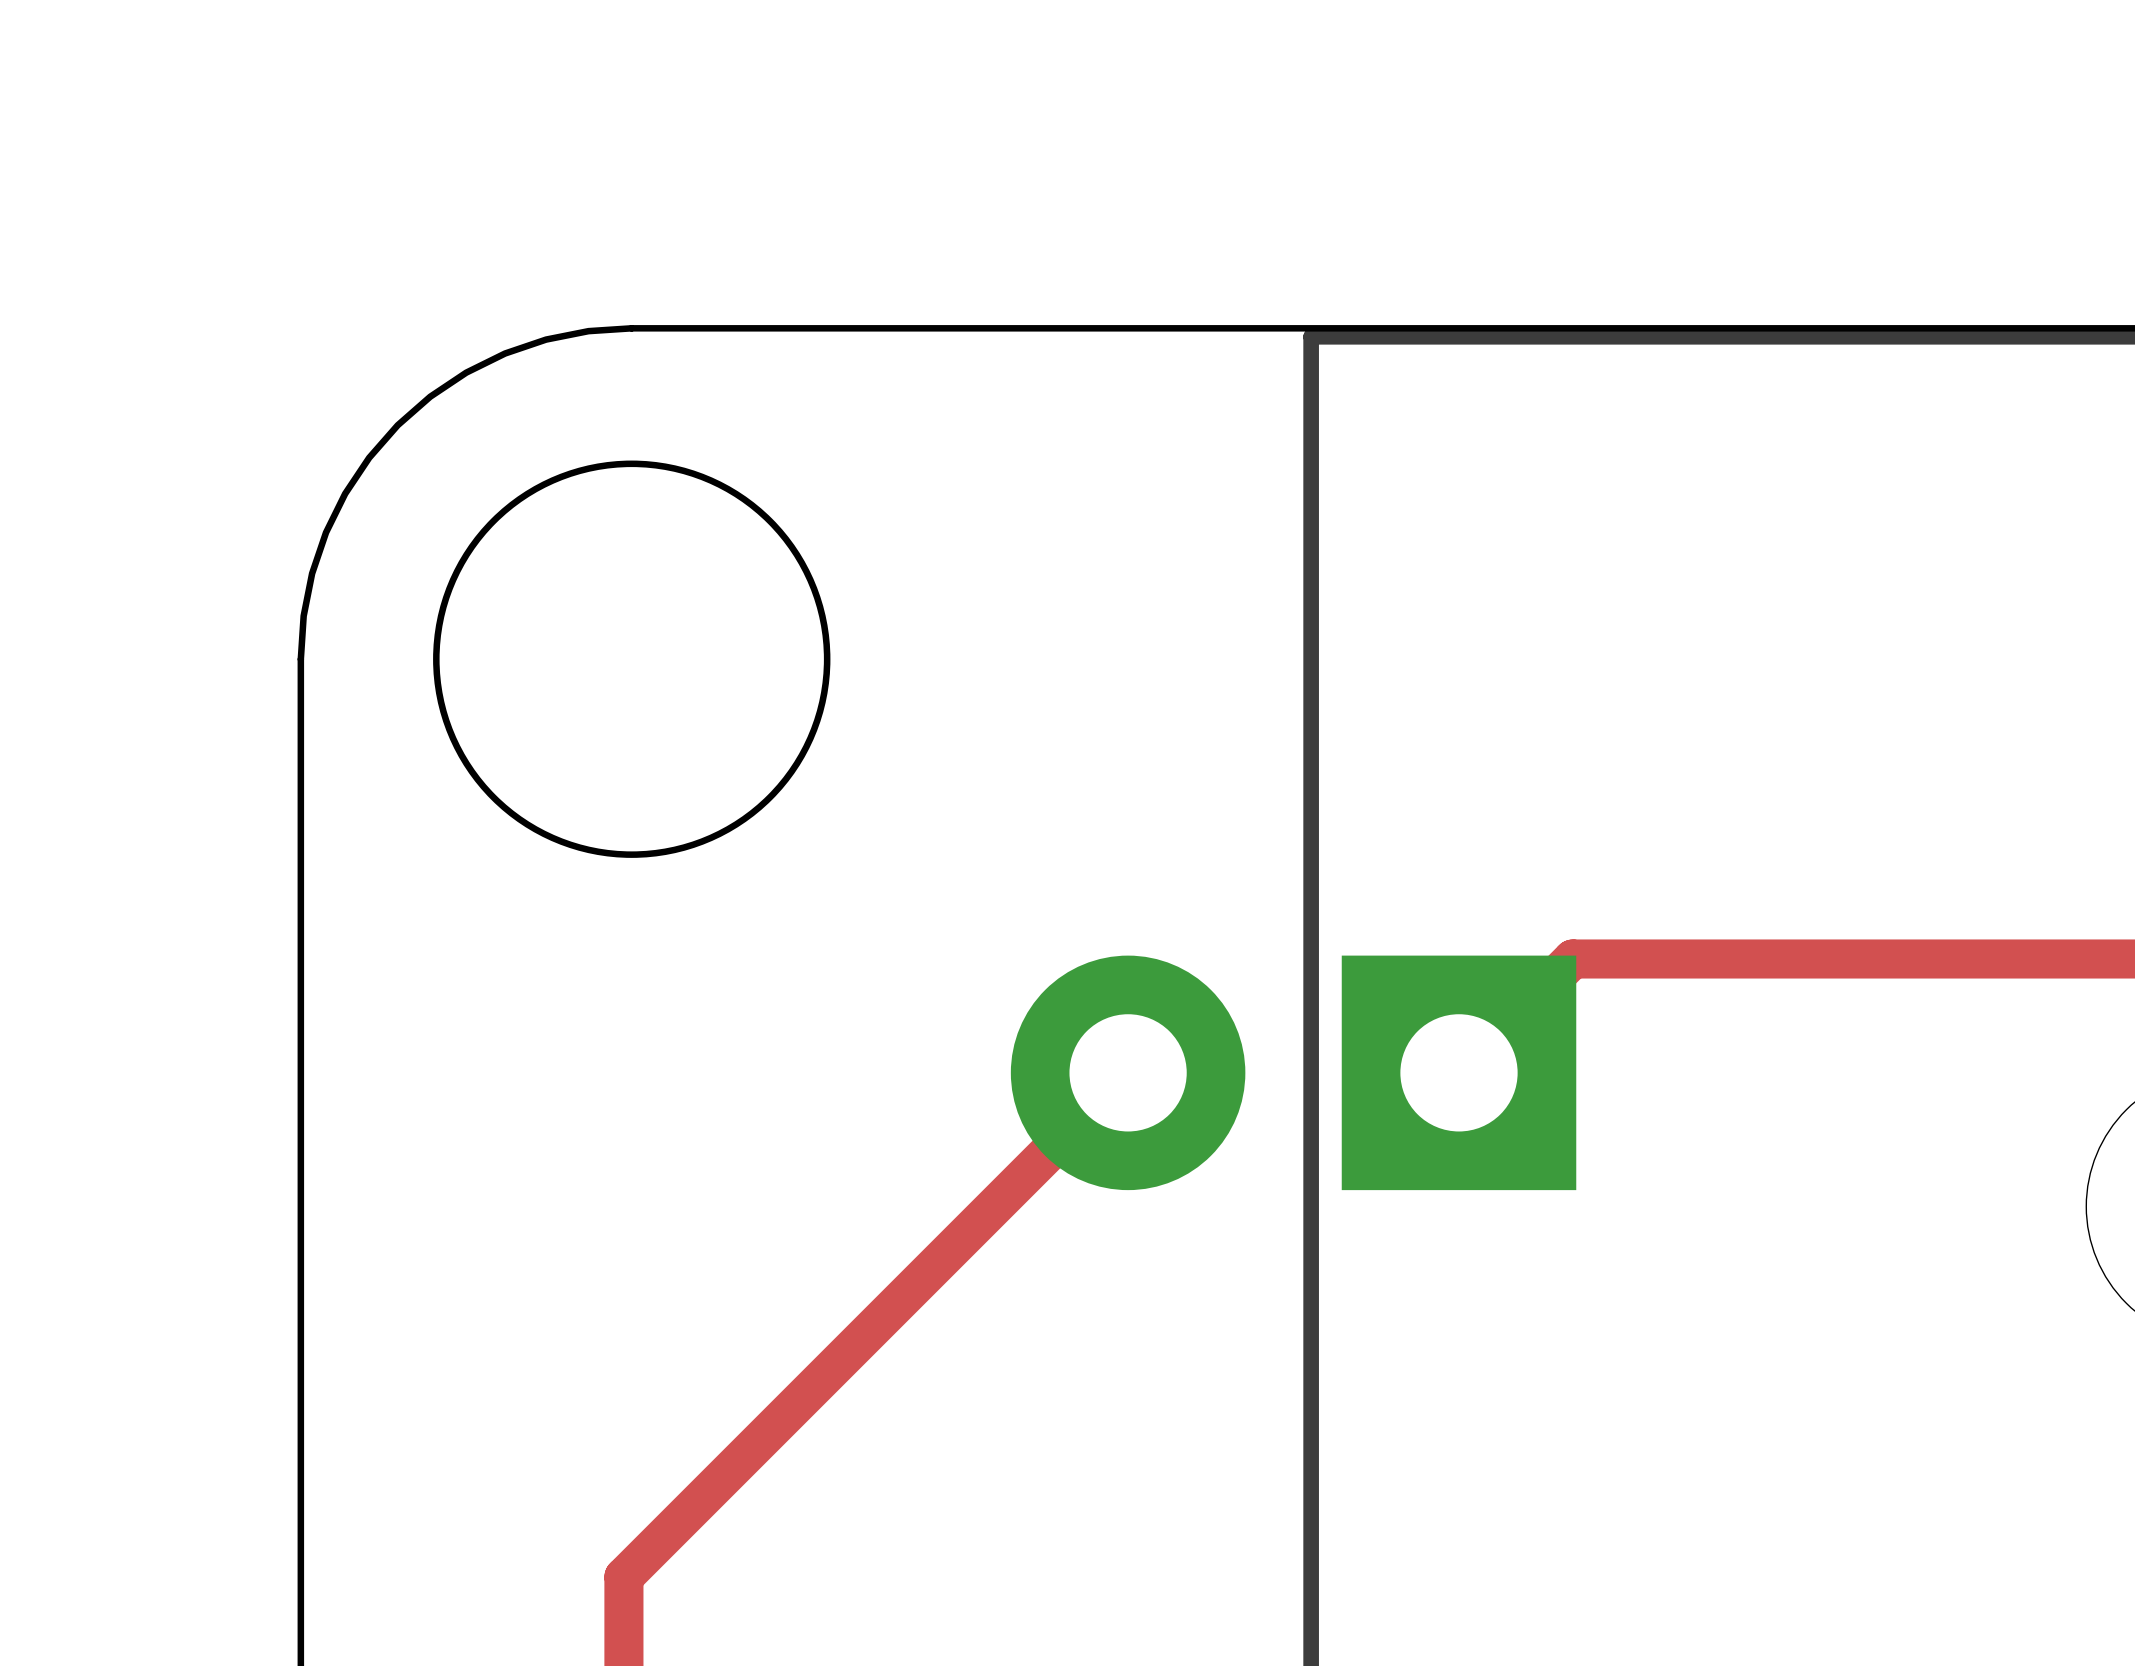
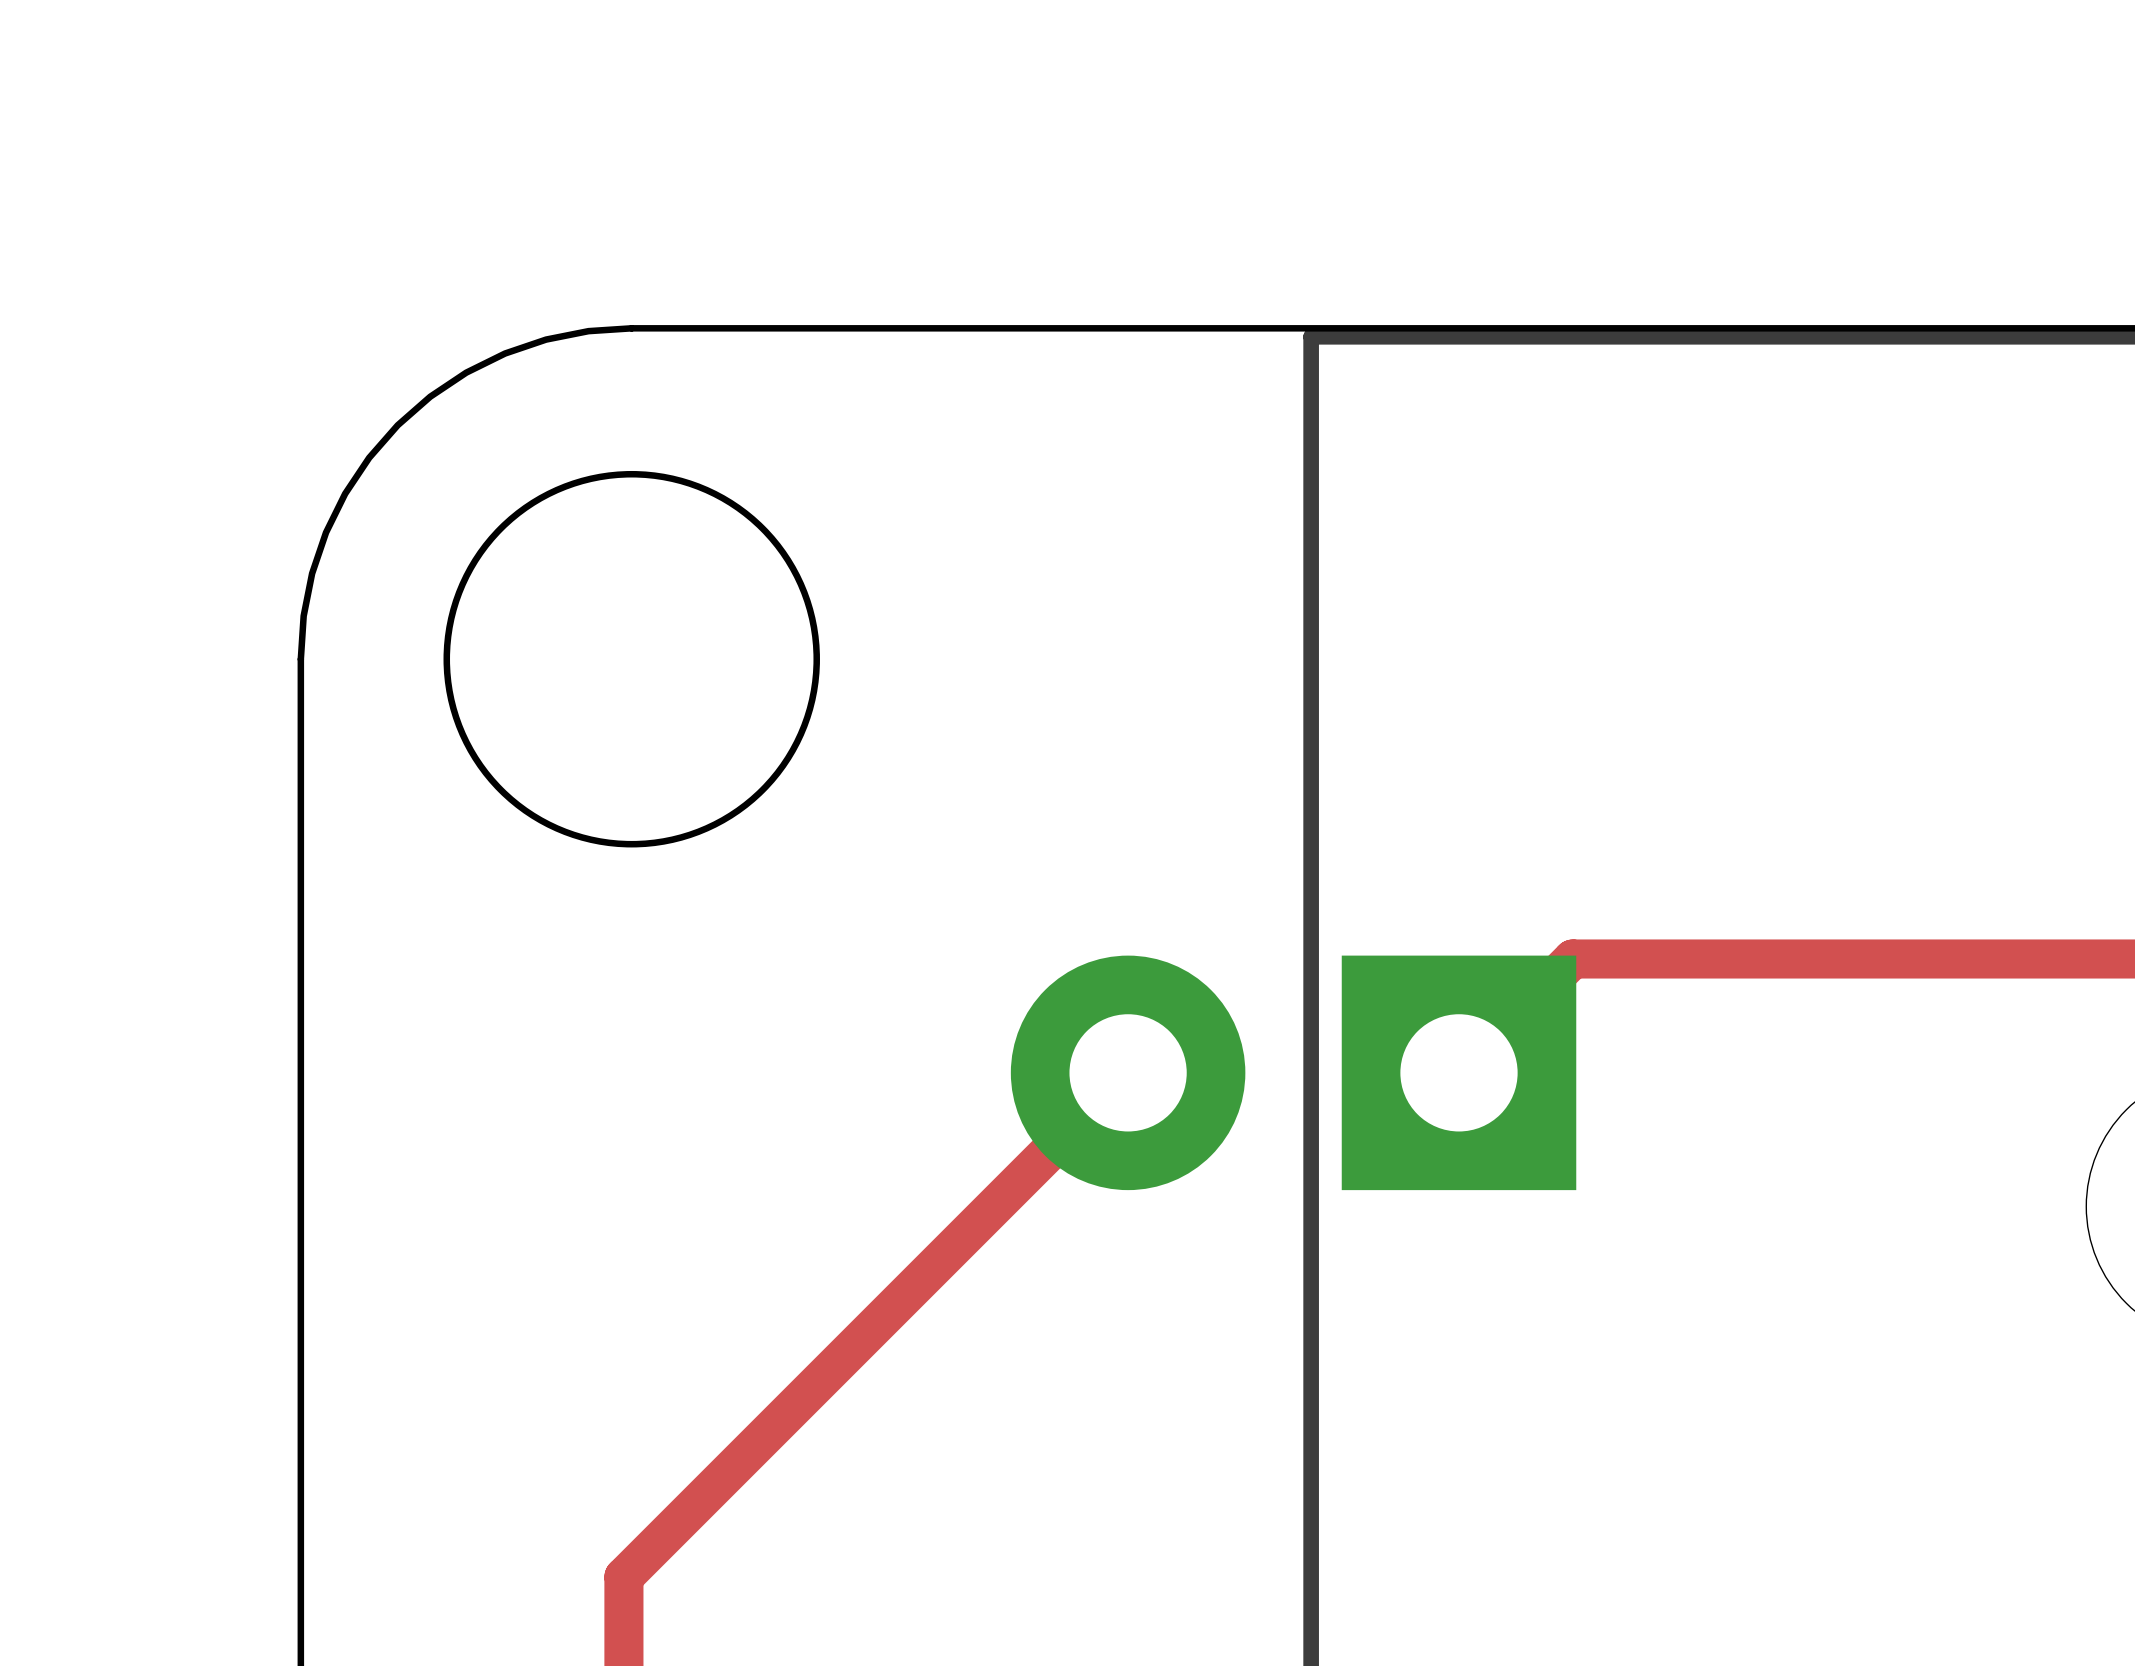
round board edge size: [433, 460, 831, 858] -> [443, 470, 820, 848]

